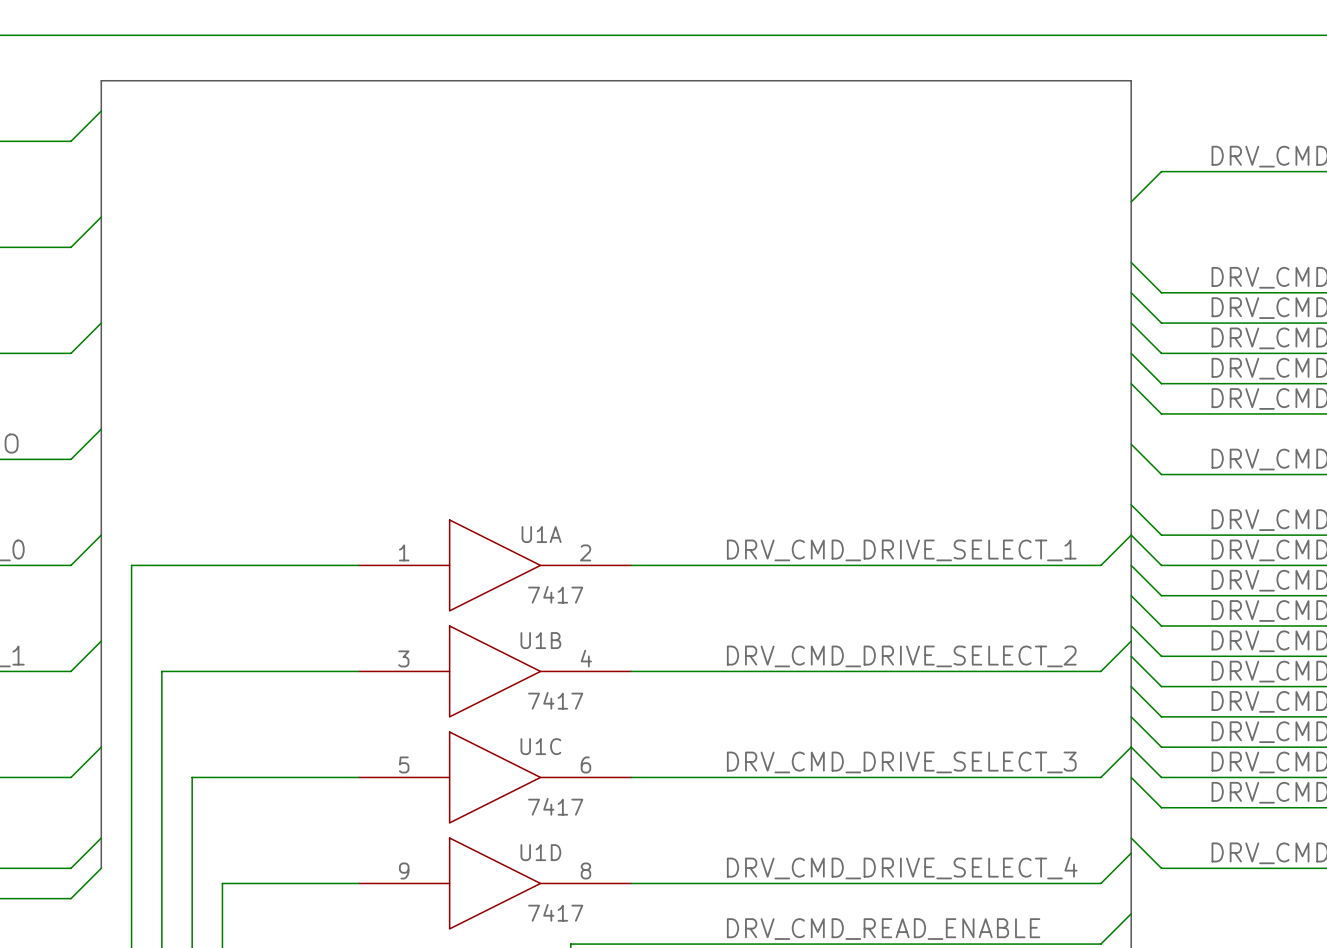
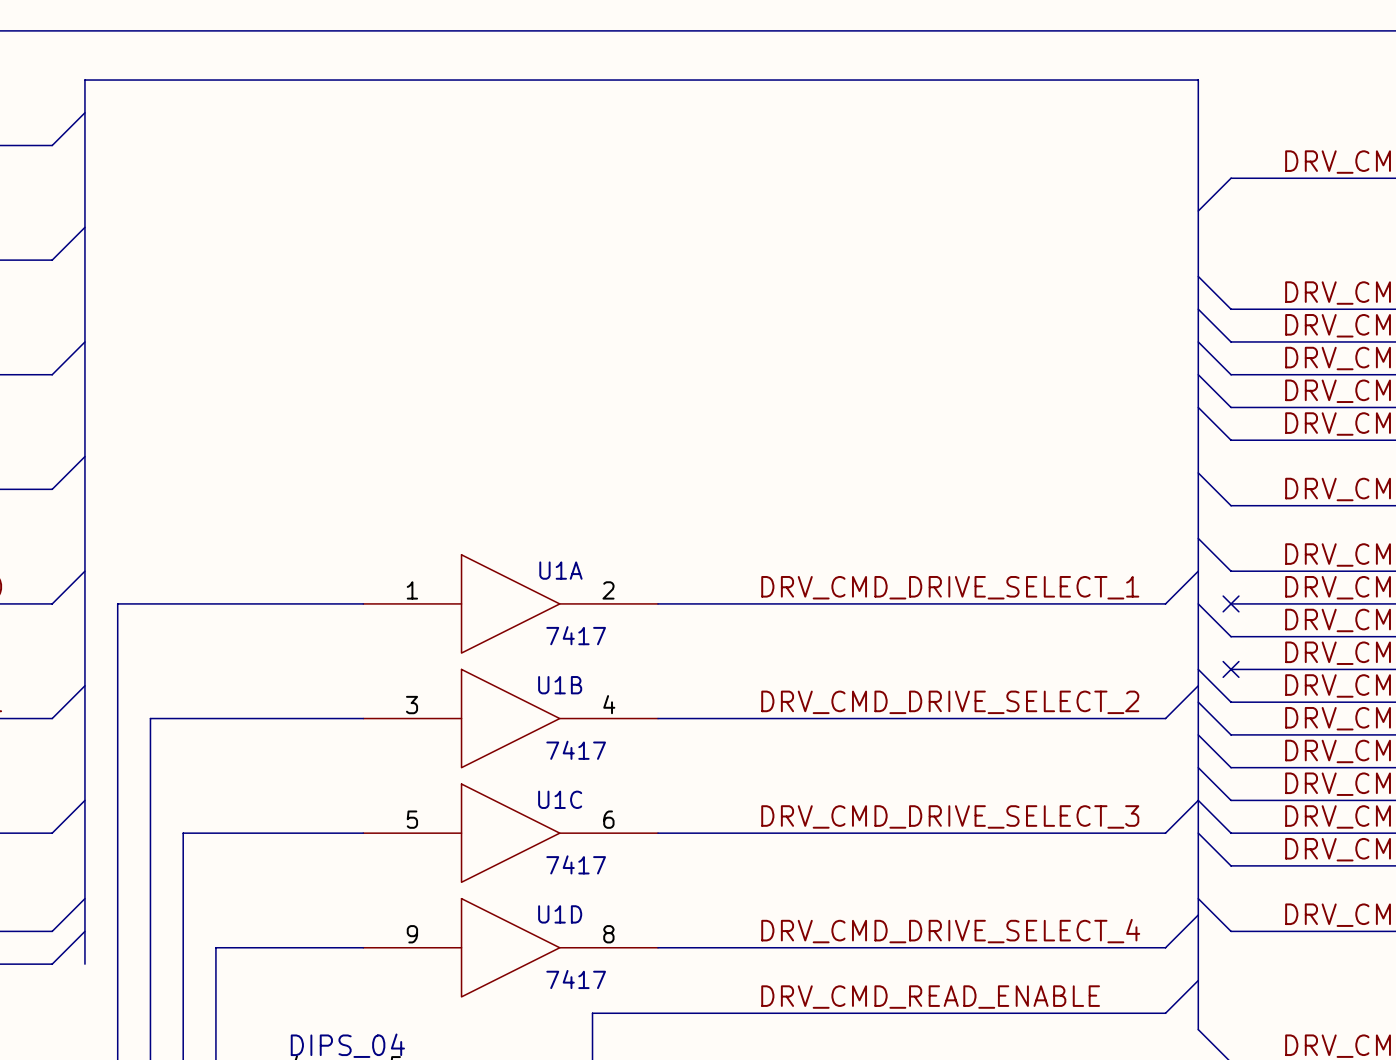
wire: (1131, 535) (1161, 565) -> none
no-connect mark: none -> (1231, 603)
wire: (1131, 595) (1161, 625) -> none
no-connect mark: none -> (1231, 669)
bus: none -> (84, 931) (84, 964)

